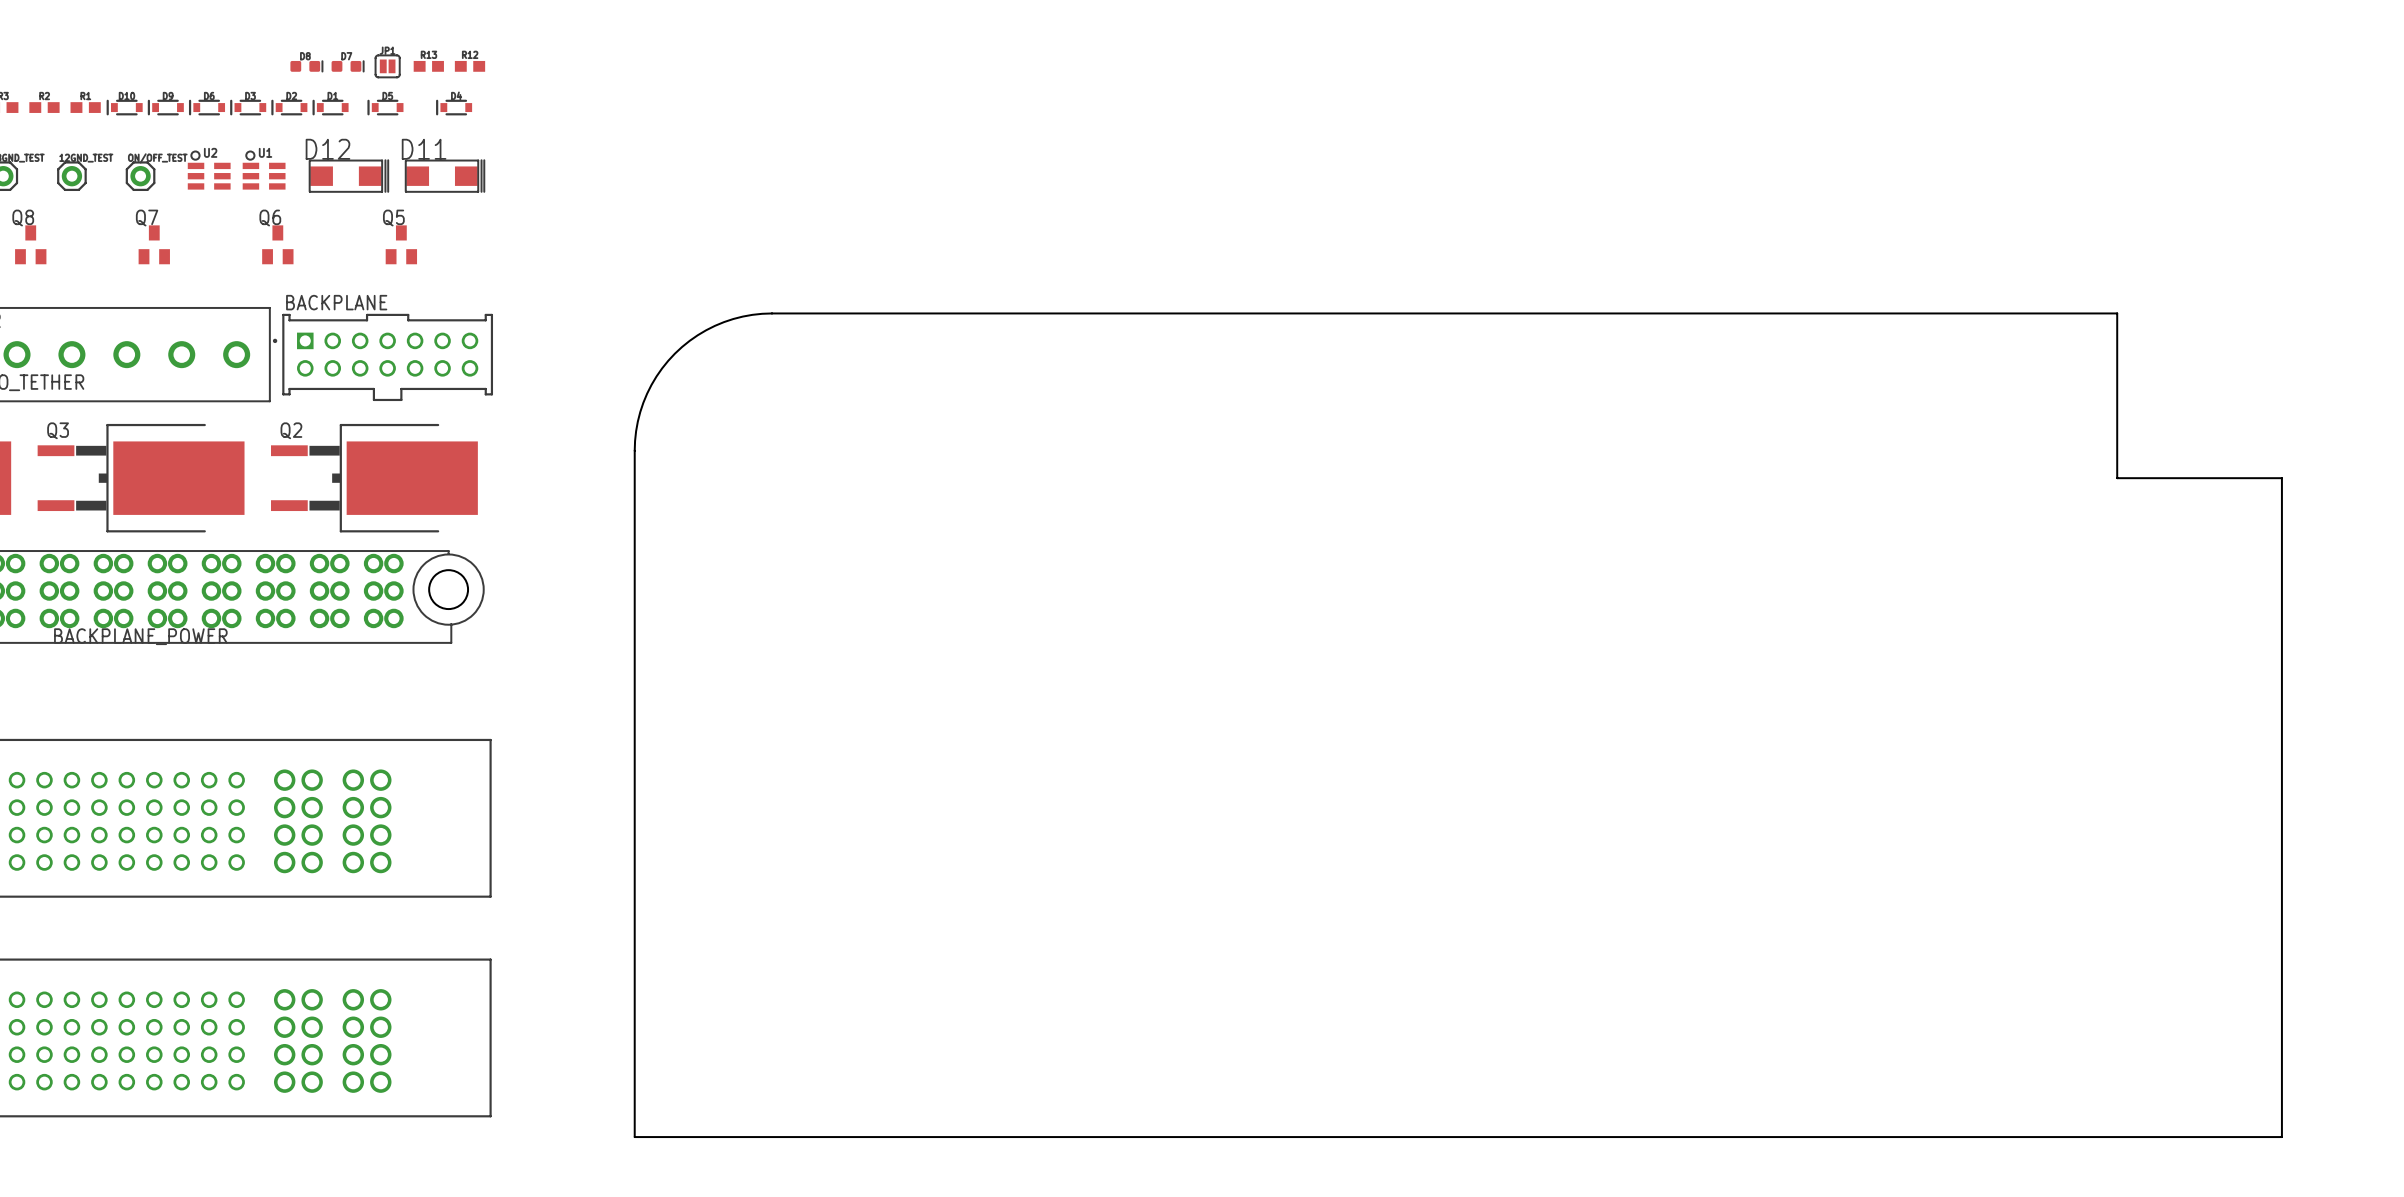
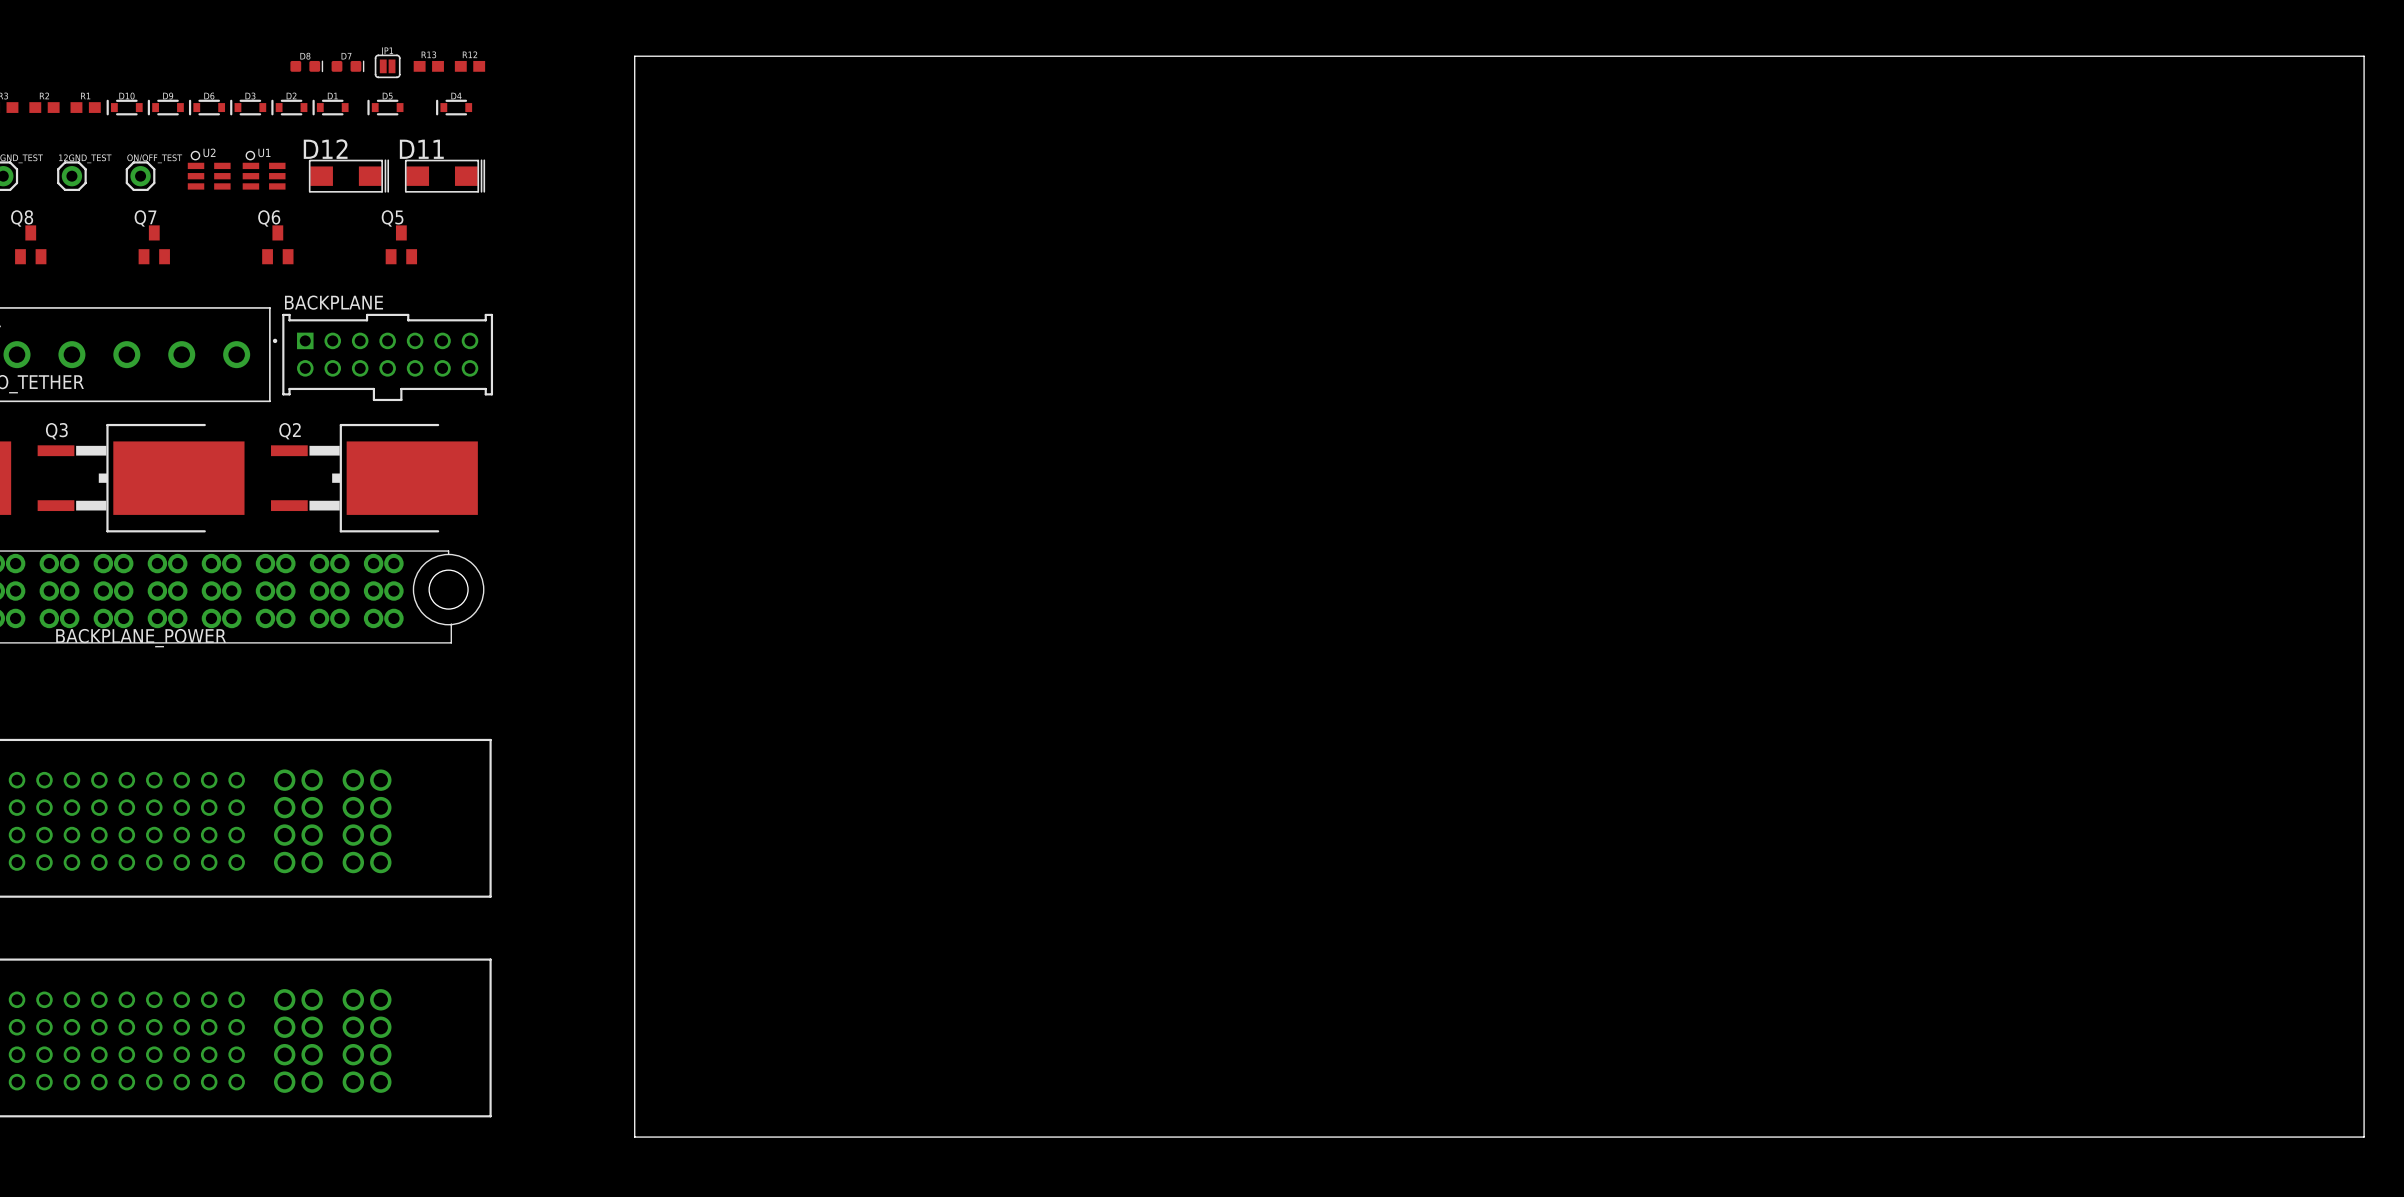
board edge: (634, 450) (637, 421) (643, 402) (656, 376) (674, 353) (689, 340) (714, 325) (742, 316) (762, 313) (2117, 313) (2117, 478) (2281, 478) (2281, 1137) -> (634, 450) (634, 56) (2364, 56) (2364, 1137) (2281, 1137)

